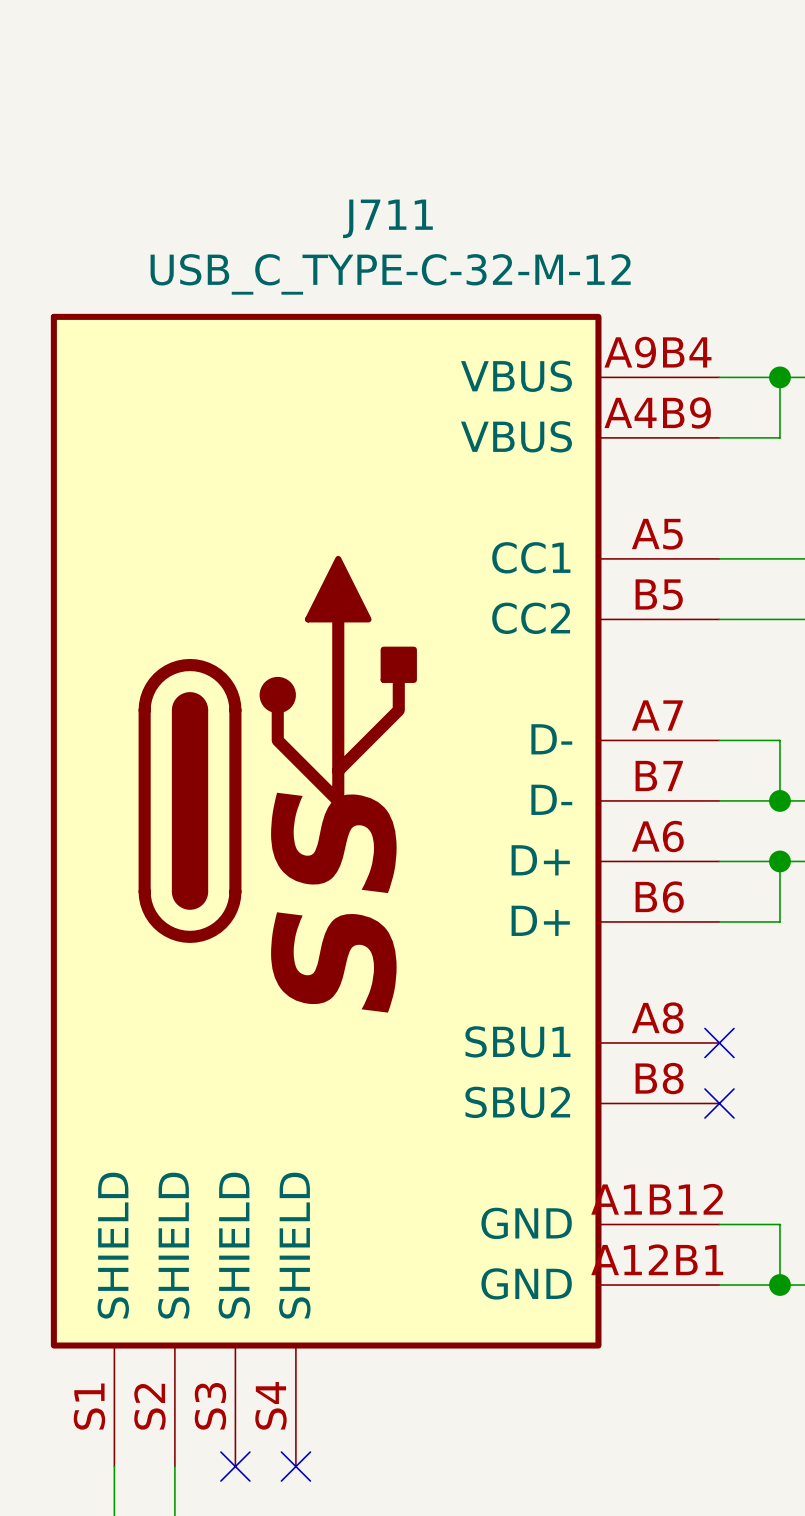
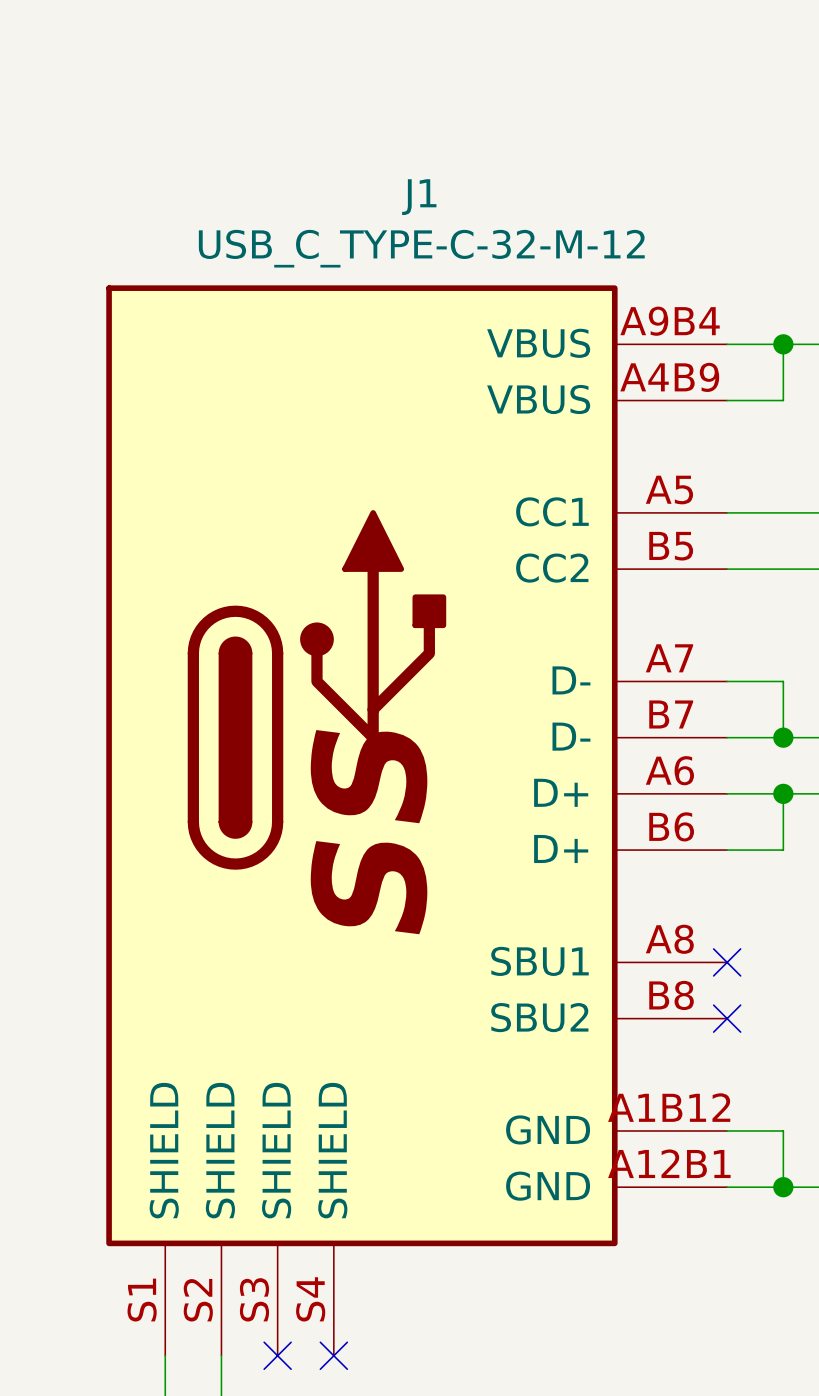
J711: USB_C_TYPE-C-32-M-12 (385, 890) -> none
J1: none -> USB_C_TYPE-C-32-M-12 (416, 820)

